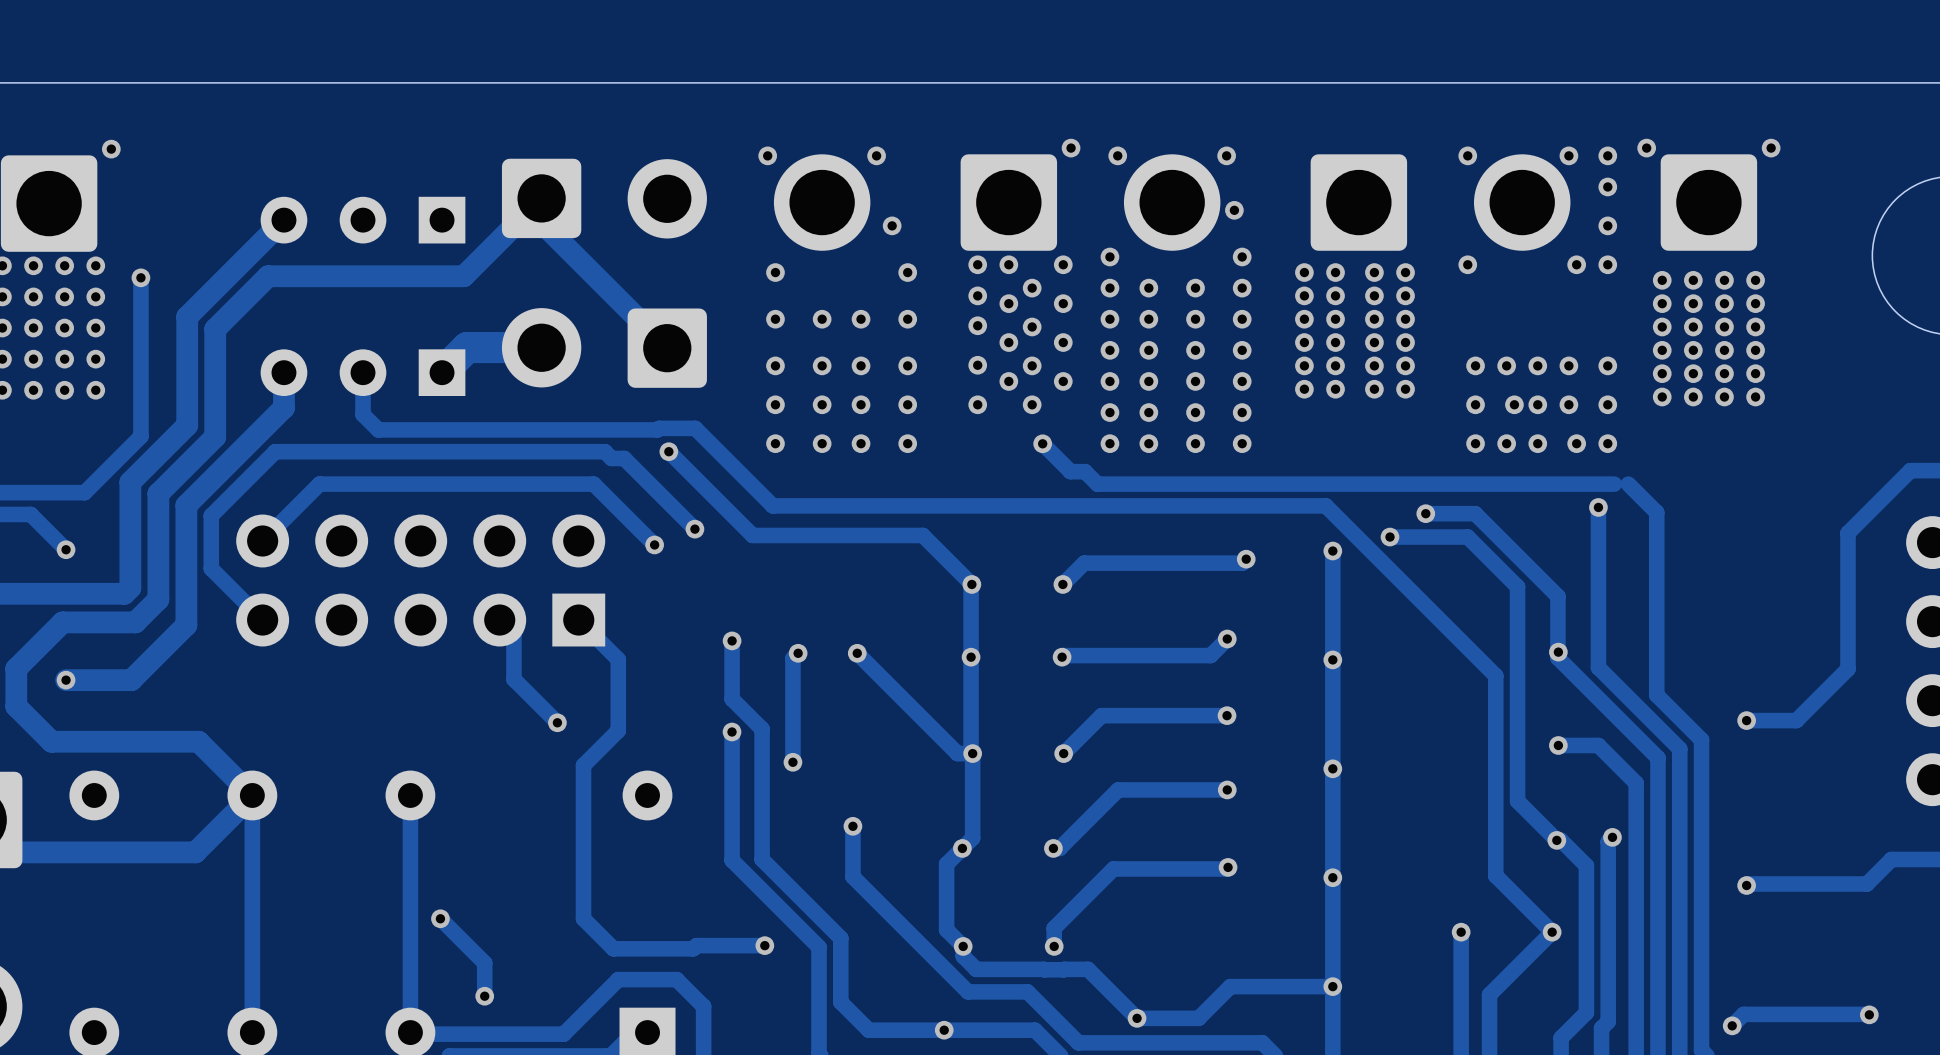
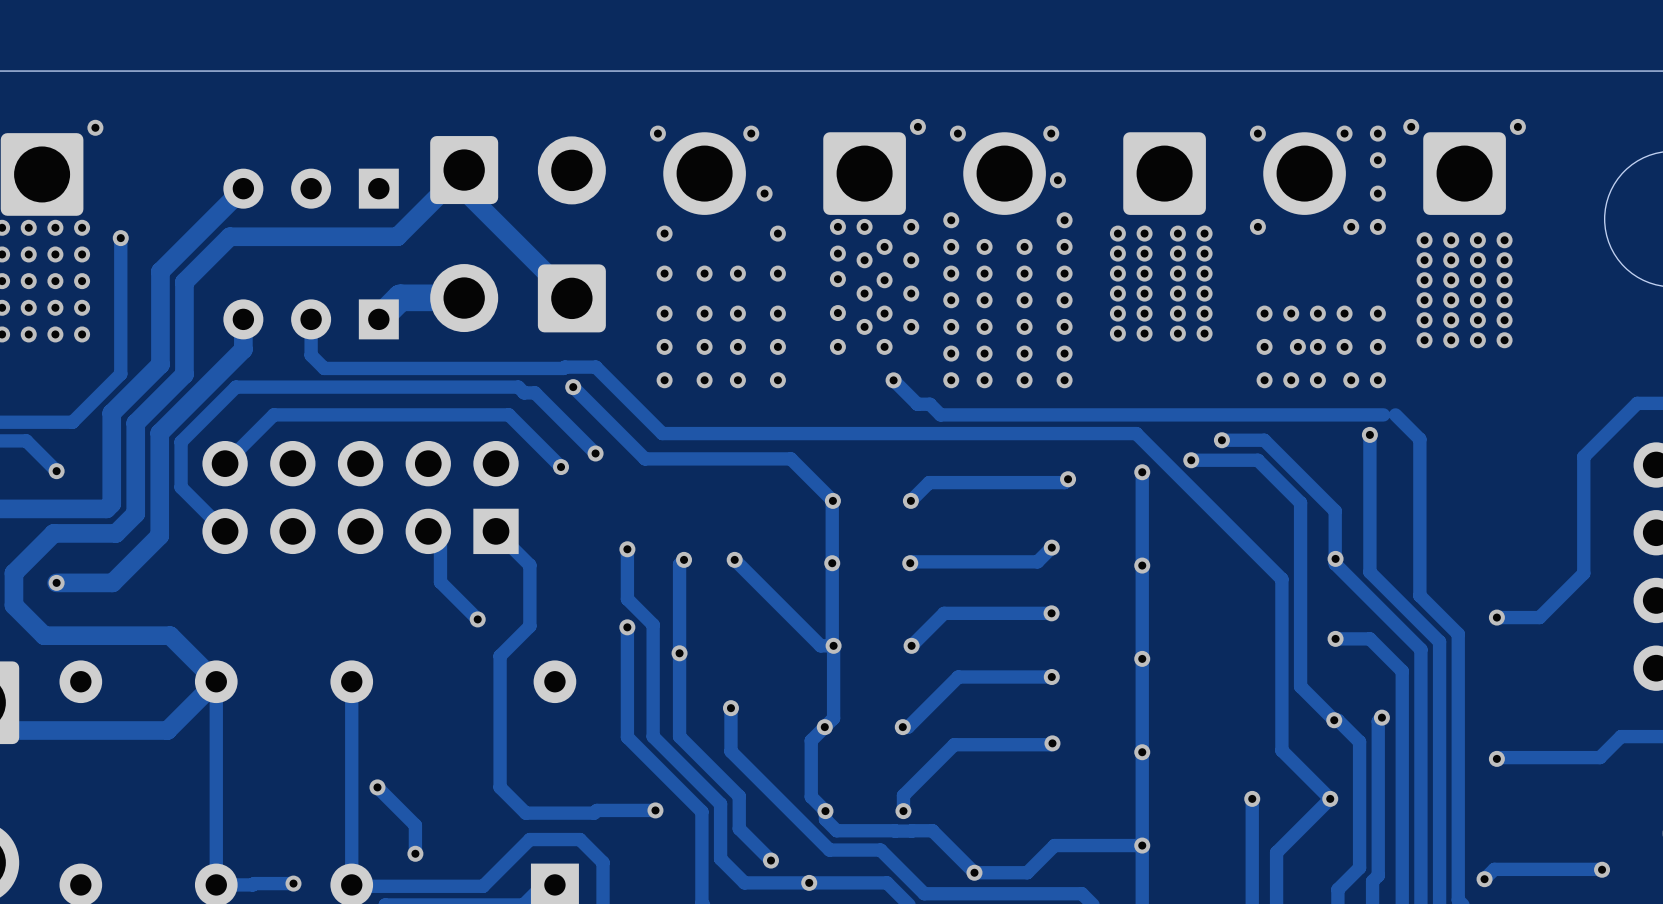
track: none -> (679, 653) (679, 736) (739, 796) (739, 828) (771, 860)
via: none -> (771, 860)
track: none -> (293, 883) (216, 884)
via: none -> (293, 883)

